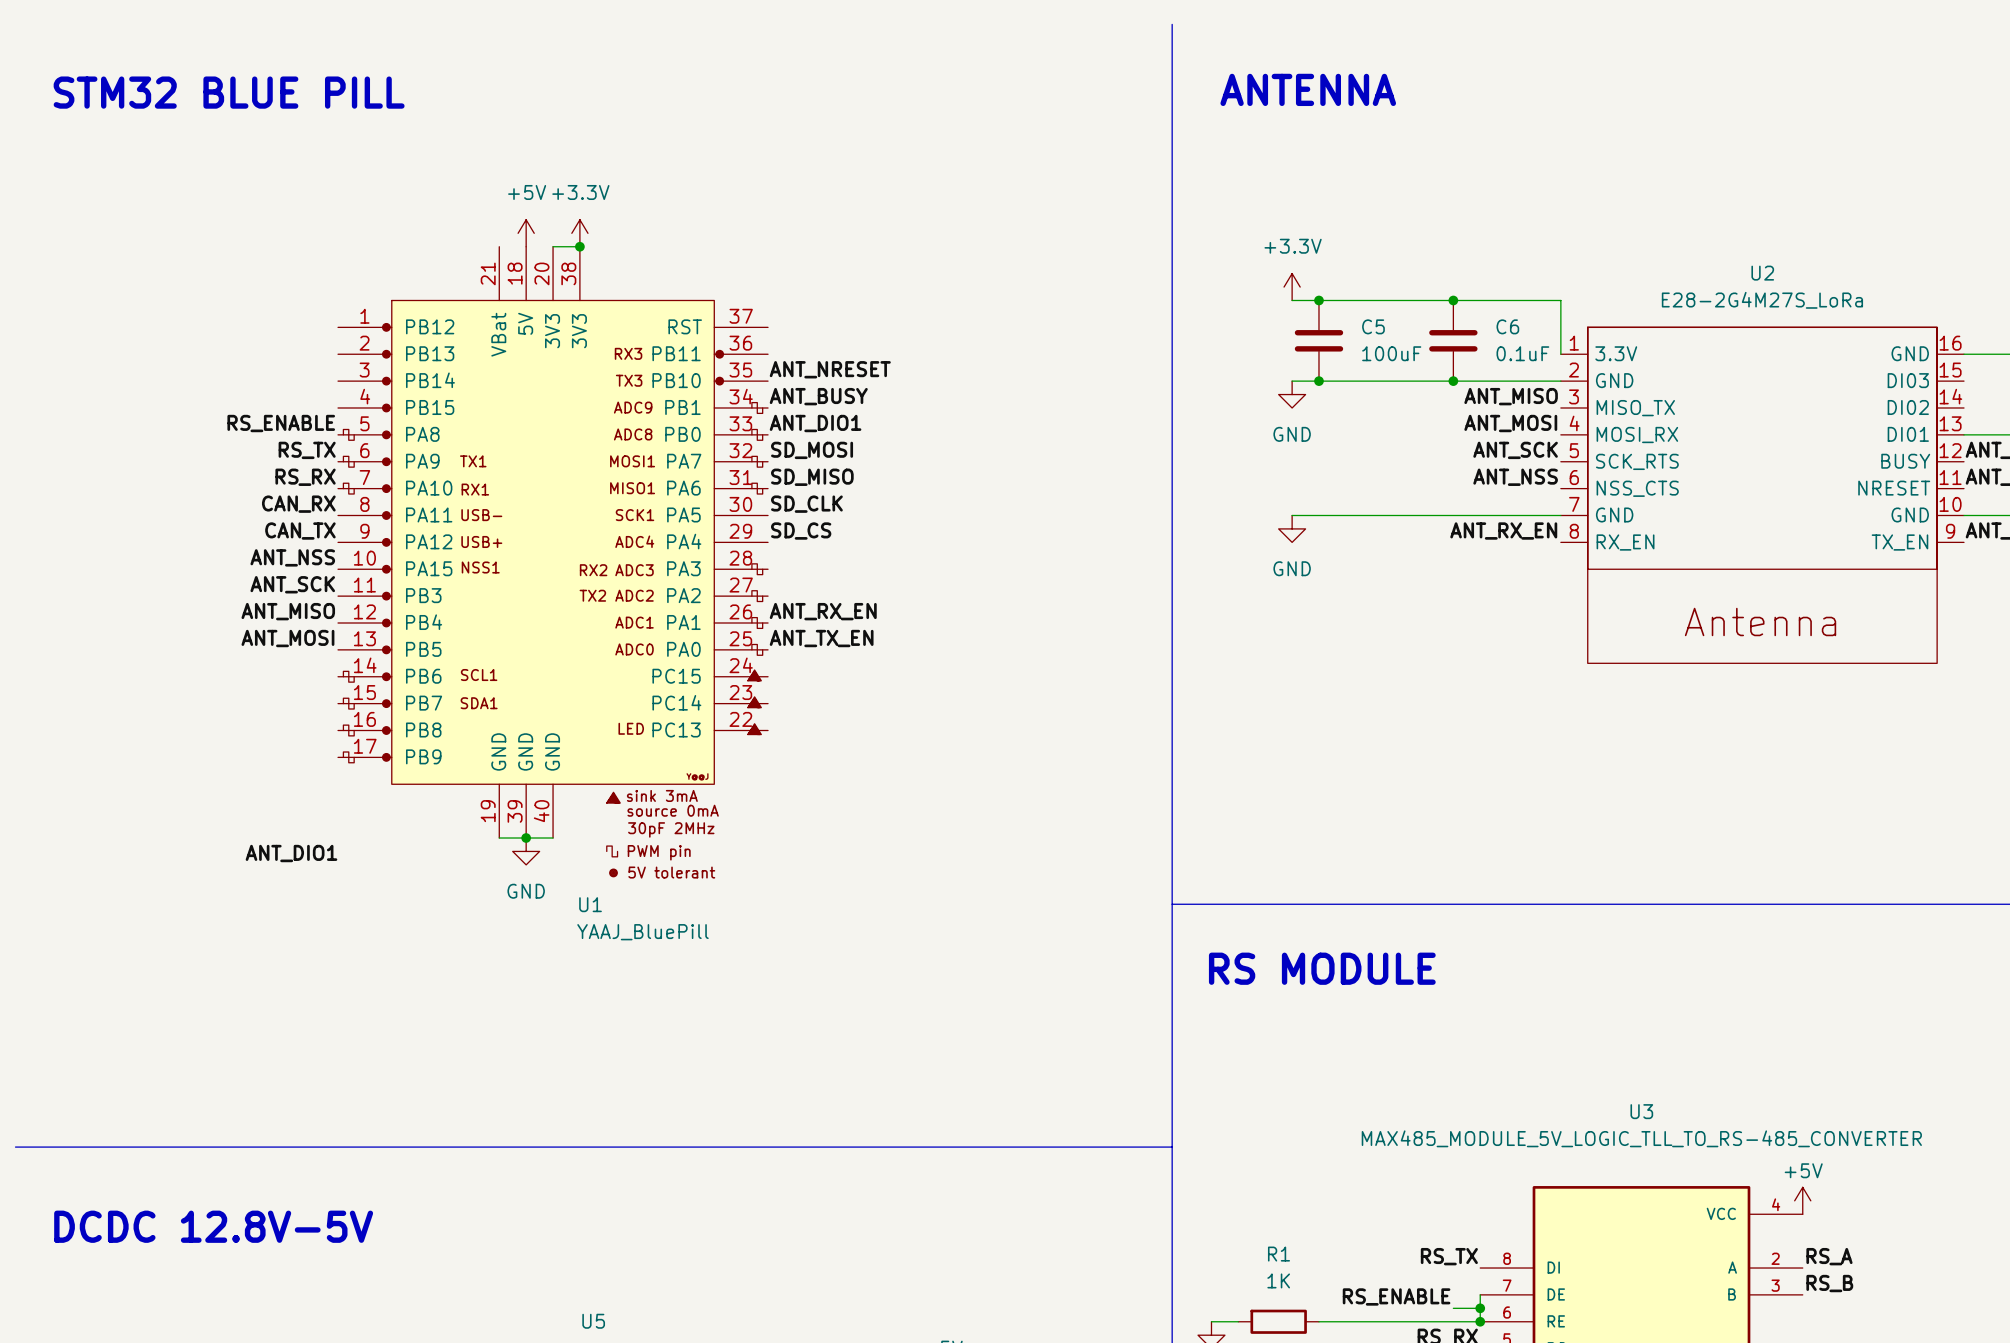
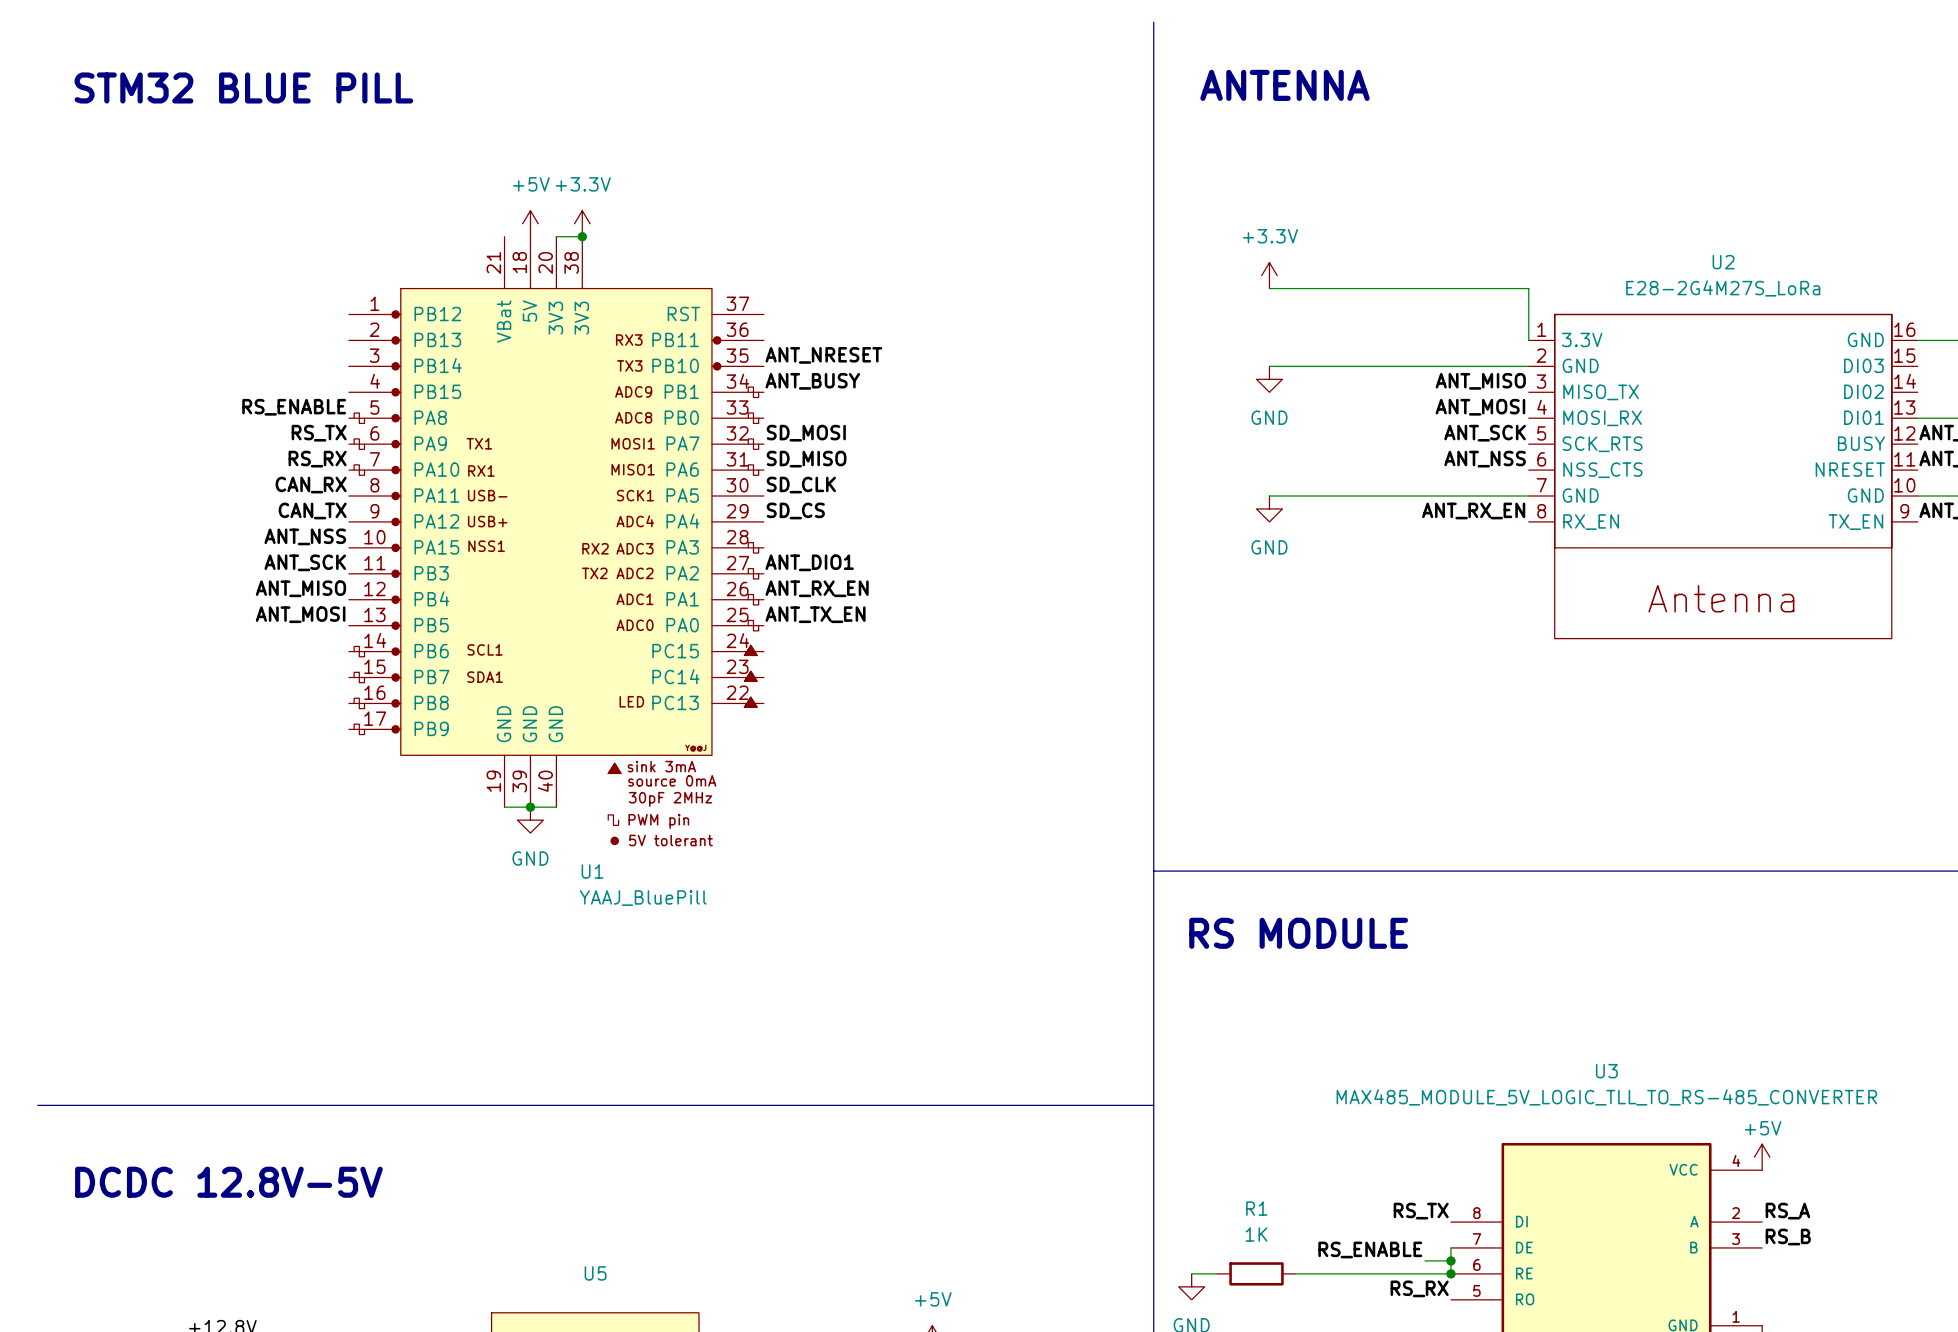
junction: (1318, 300) -> none
junction: (1453, 300) -> none
C5: 100uF (1318, 340) -> none
C6: 0.1uF (1453, 340) -> none
junction: (1318, 381) -> none
junction: (1453, 381) -> none
label position: ANT_DIO1 (815, 423) -> ANT_DIO1 (809, 562)
label: ANT_DIO1 (291, 853) -> none

